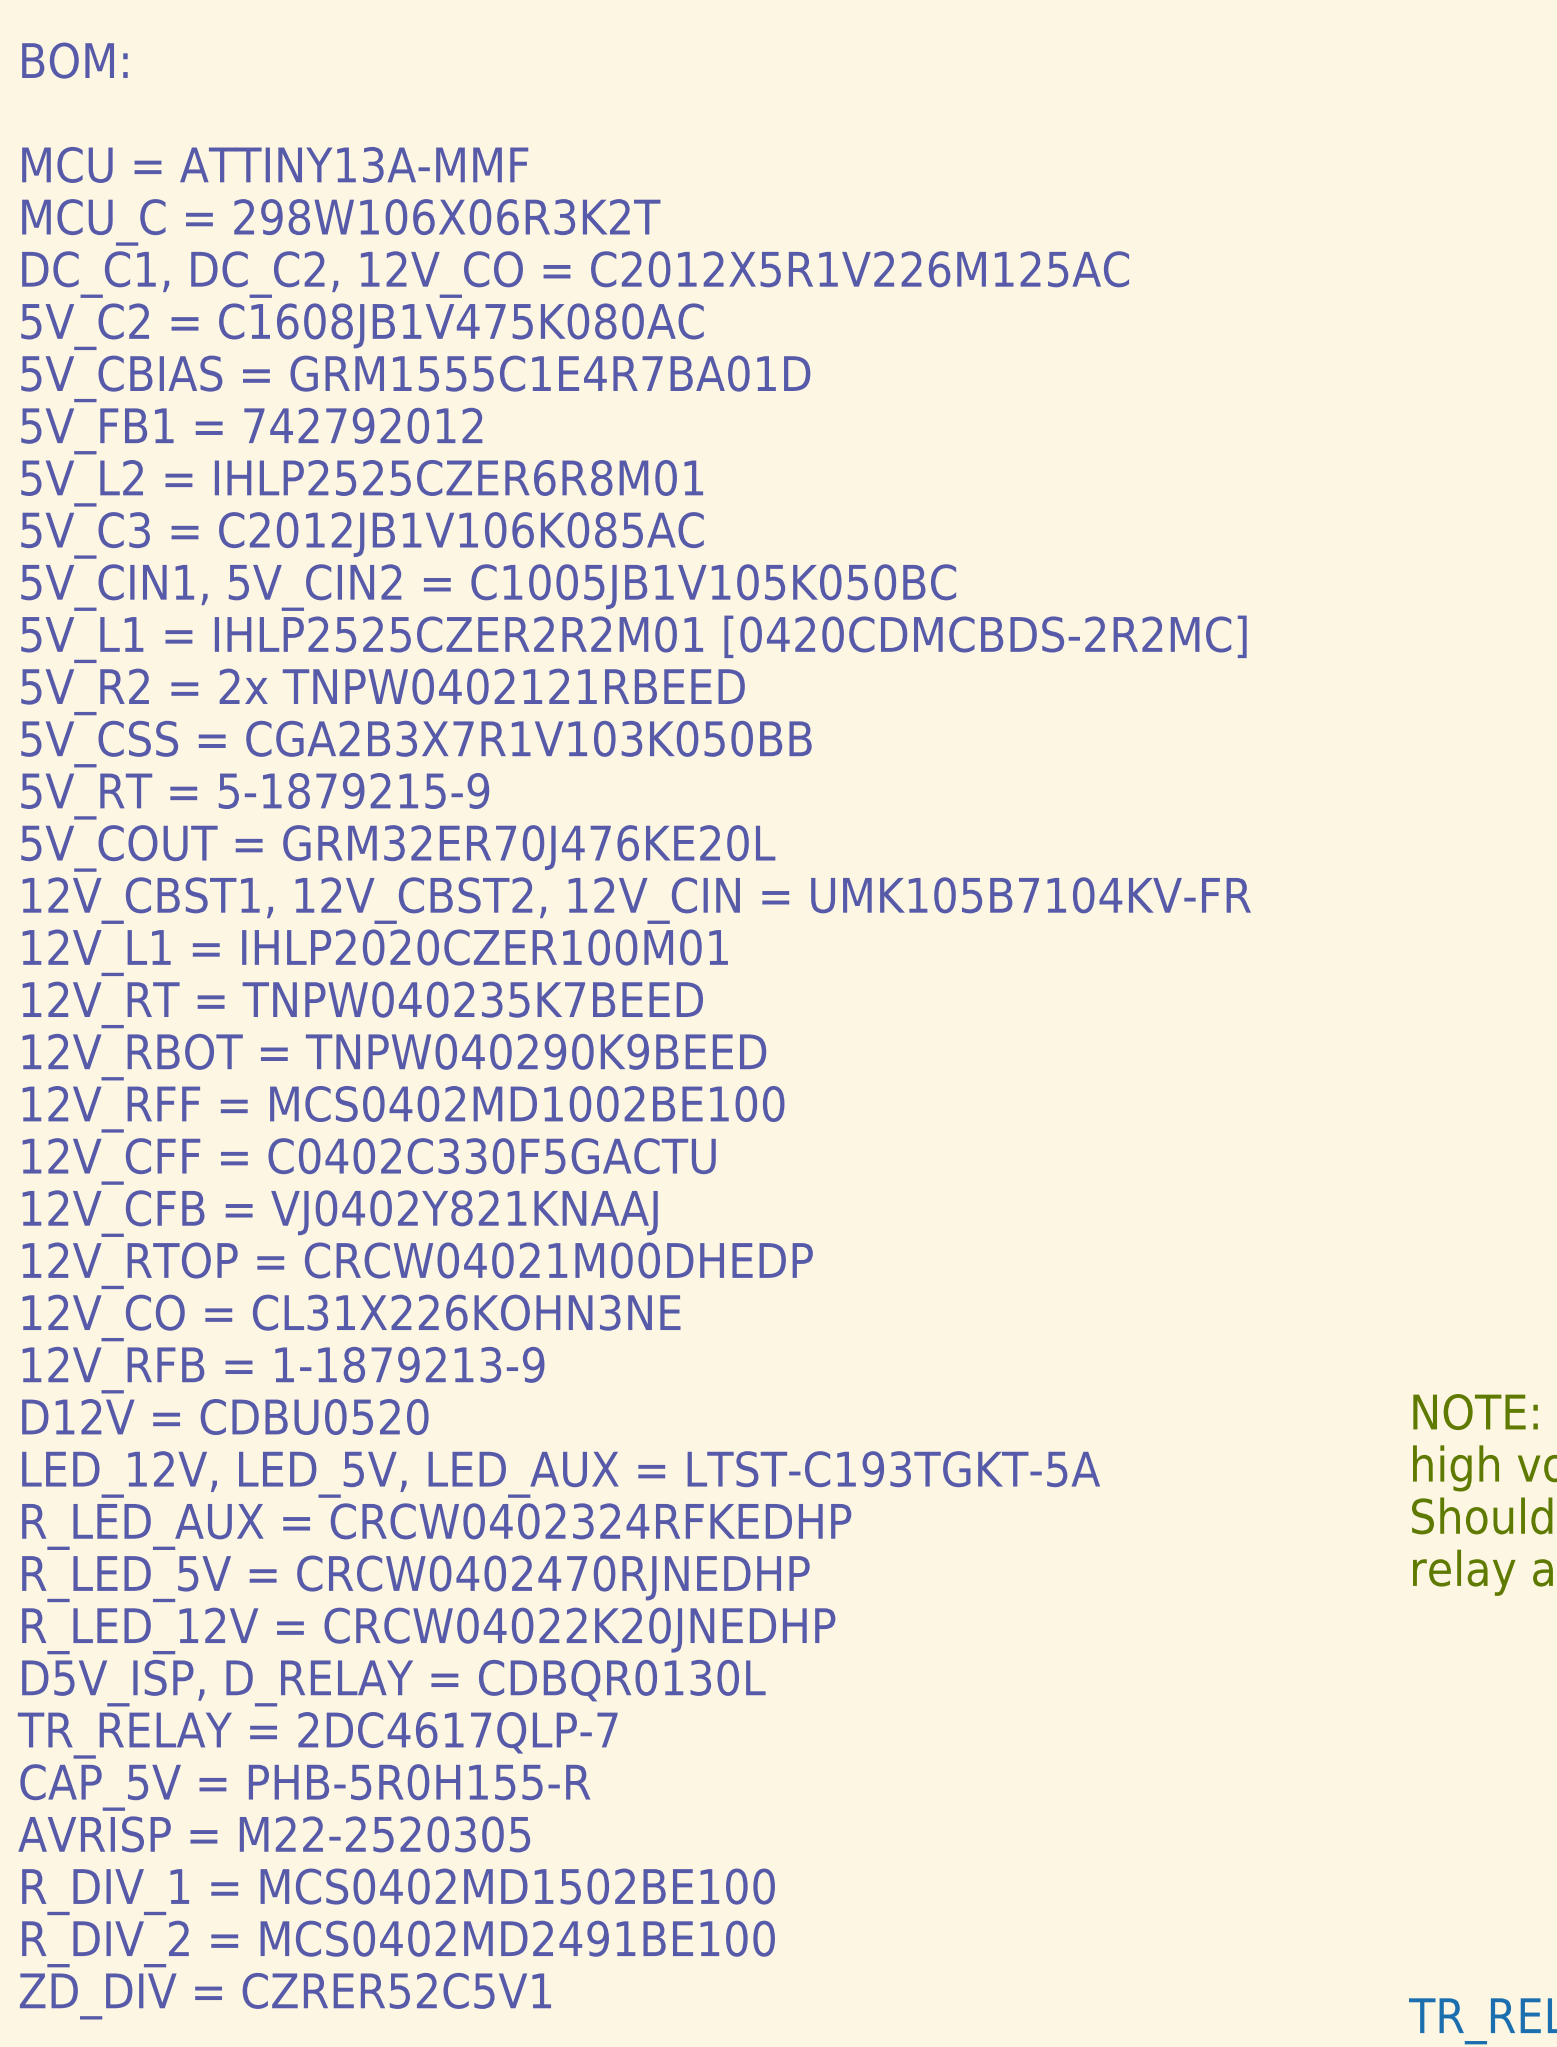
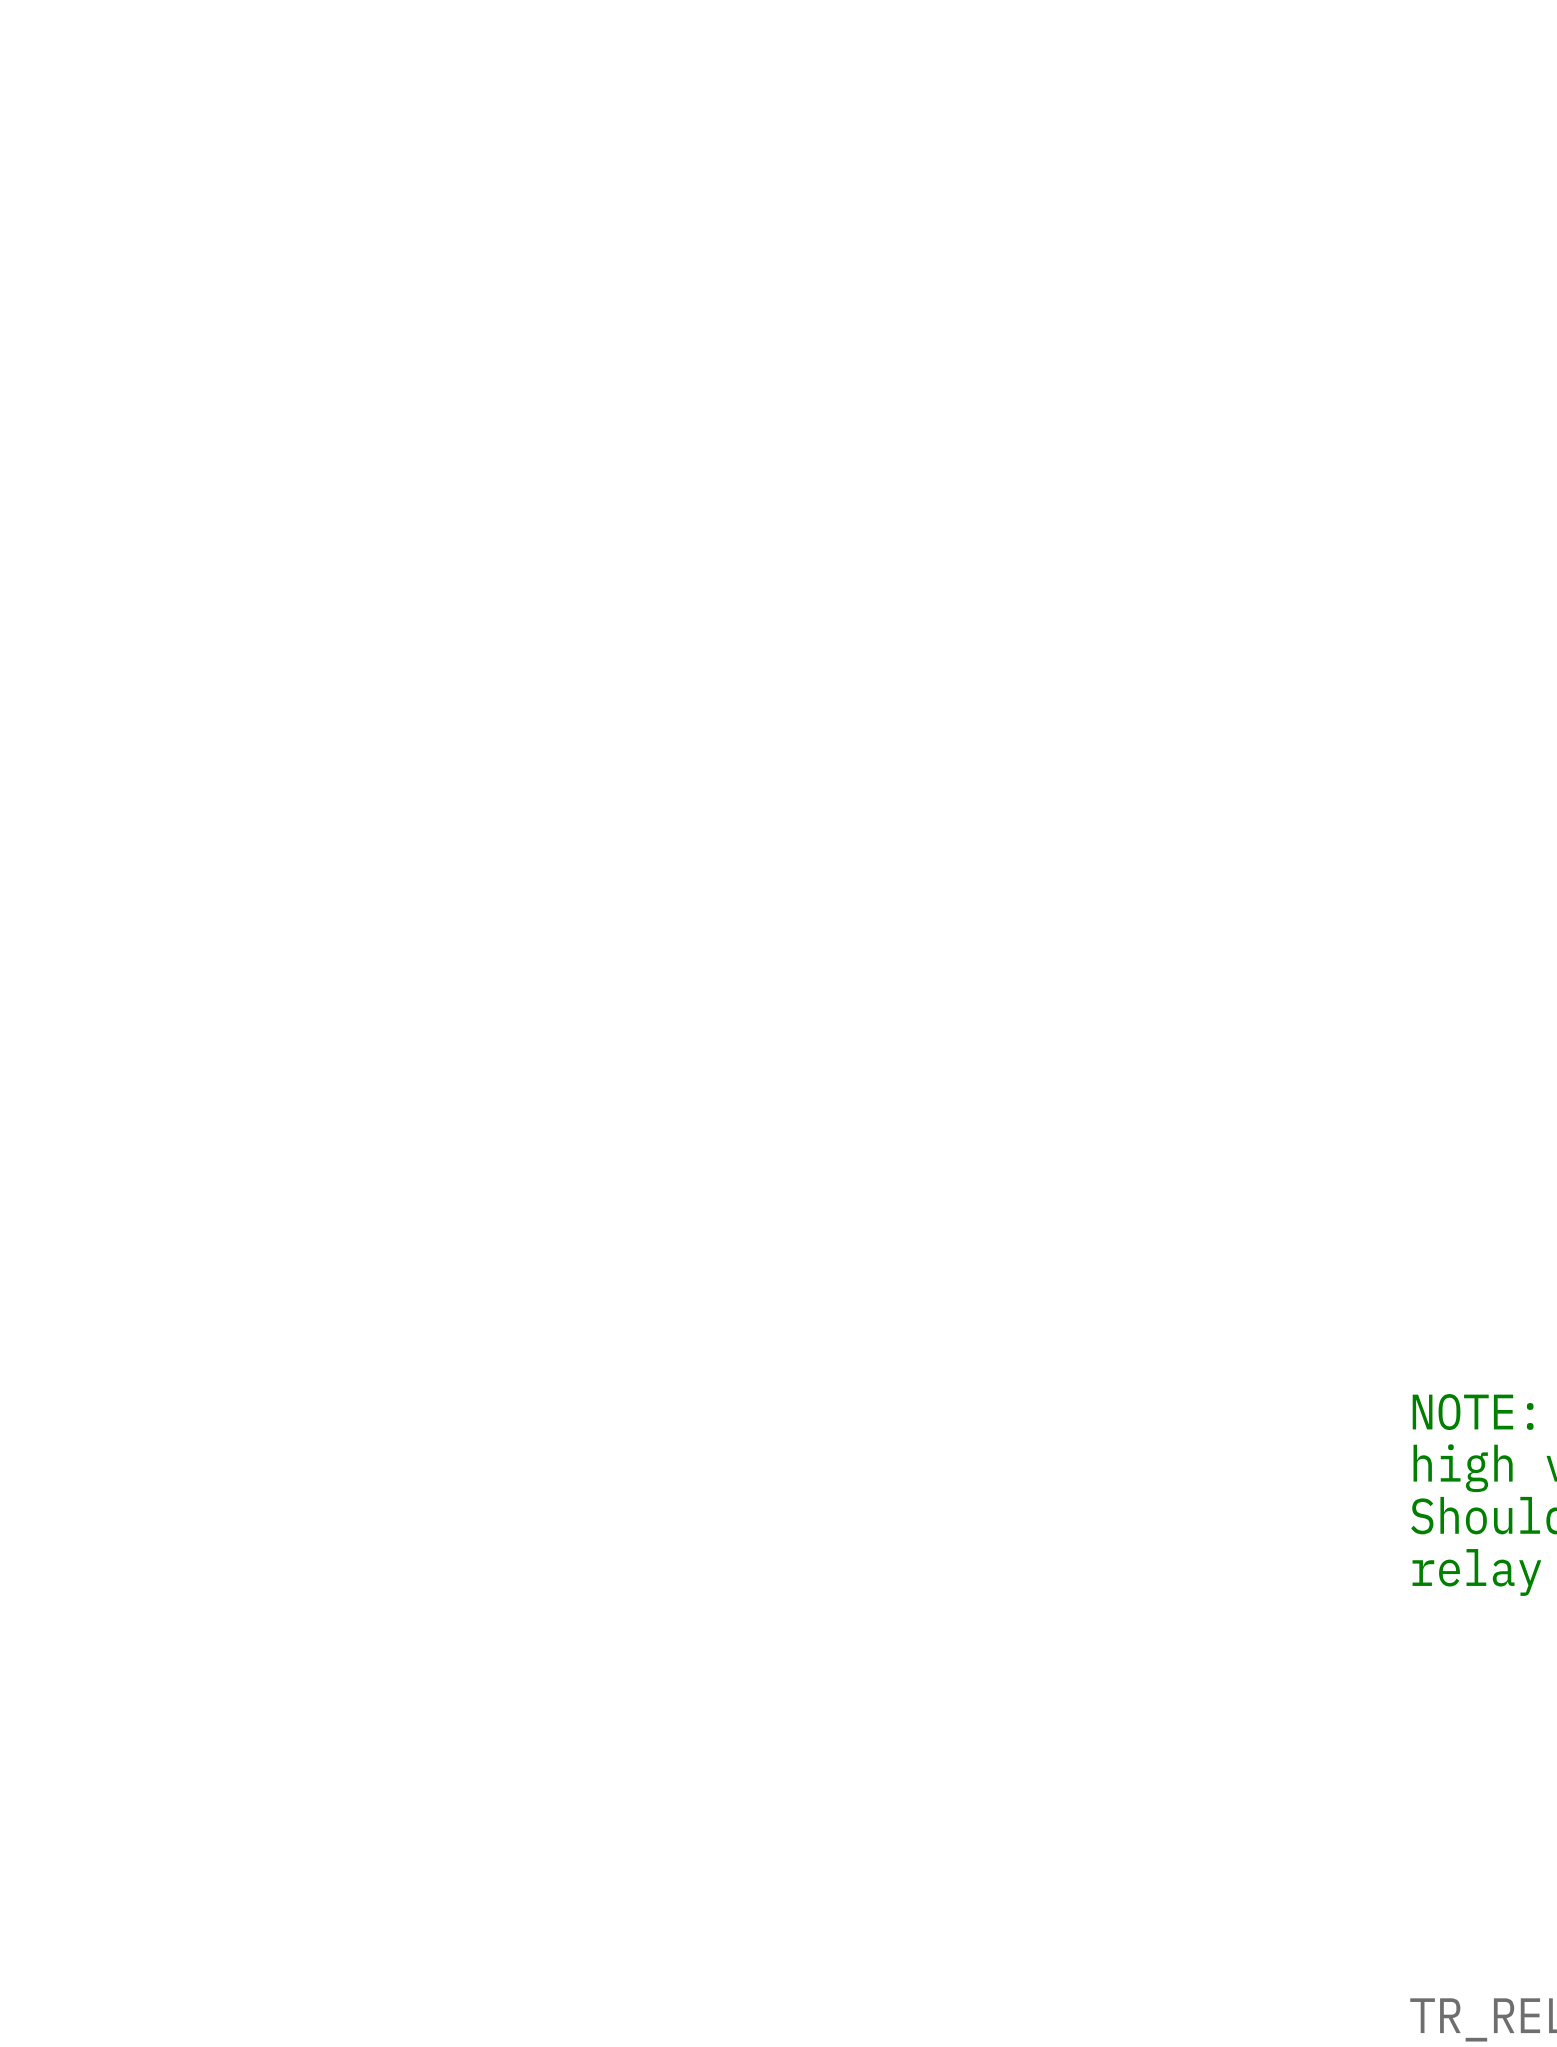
text: BOM: (74, 60) -> none
text: MCU = ATTINY13A-MMF (275, 164) -> none
text: MCU_C = 298W106X06R3K2T (341, 222) -> none
text: DC_C1, DC_C2, 12V_CO = C2012X5R1V226M125AC (575, 274) -> none
text: 5V_C2 = C1608JB1V475K080AC (362, 326) -> none
text: 5V_CBIAS = GRM1555C1E4R7BA01D (415, 378) -> none
text: 5V_FB1 = 742792012 (251, 431) -> none
text: 5V_L2 = IHLP2525CZER6R8M01 (362, 483) -> none
text: 5V_C3 = C2012JB1V106K085AC (362, 535) -> none
text: 5V_CIN1, 5V_CIN2 = C1005JB1V105K050BC (488, 587) -> none
text: 5V_L1 = IHLP2525CZER2R2M01 [0420CDMCBDS-2R2MC] (633, 639) -> none
text: 5V_R2 = 2x TNPW0402121RBEED (383, 691) -> none
text: 5V_CSS = CGA2B3X7R1V103K050BB (416, 744) -> none
text: 5V_RT = 5-1879215-9 (255, 796) -> none
text: 5V_COUT = GRM32ER70J476KE20L (398, 848) -> none
text: 12V_CBST1, 12V_CBST2, 12V_CIN = UMK105B7104KV-FR (636, 900) -> none
text: 12V_L1 = IHLP2020CZER100M01 (375, 952) -> none
text: 12V_RT = TNPW040235K7BEED (362, 1004) -> none
text: 12V_RBOT = TNPW040290K9BEED (394, 1057) -> none
text: 12V_RFF = MCS0402MD1002BE100 (403, 1109) -> none
text: 12V_CFF = C0402C330F5GACTU (369, 1161) -> none
text: 12V_CFB = VJ0402Y821KNAAJ (340, 1213) -> none
text: 12V_RTOP = CRCW04021M00DHEDP (417, 1265) -> none
text: 12V_CO = CL31X226KOHN3NE (351, 1317) -> none
text: 12V_RFB = 1-1879213-9 (283, 1370) -> none
text: D12V = CDBU0520 (225, 1417) -> none
text: LED_12V, LED_5V, LED_AUX = LTST-C193TGKT-5A (561, 1474) -> none
text: R_LED_AUX = CRCW0402324RFKEDHP (436, 1526) -> none
text: R_LED_5V = CRCW0402470RJNEDHP (415, 1578) -> none
text: R_LED_12V = CRCW04022K20JNEDHP (428, 1630) -> none
text: D5V_ISP, D_RELAY = CDBQR0130L (393, 1683) -> none
text: TR_RELAY = 2DC4617QLP-7 (317, 1735) -> none
text: CAP_5V = PHB-5R0H155-R (305, 1787) -> none
text: AVRISP = M22-2520305 (274, 1834) -> none
text: R_DIV_1 = MCS0402MD1502BE100 (398, 1891) -> none
text: R_DIV_2 = MCS0402MD2491BE100 (398, 1944) -> none
text: ZD_DIV = CZRER52C5V1 (285, 1996) -> none

